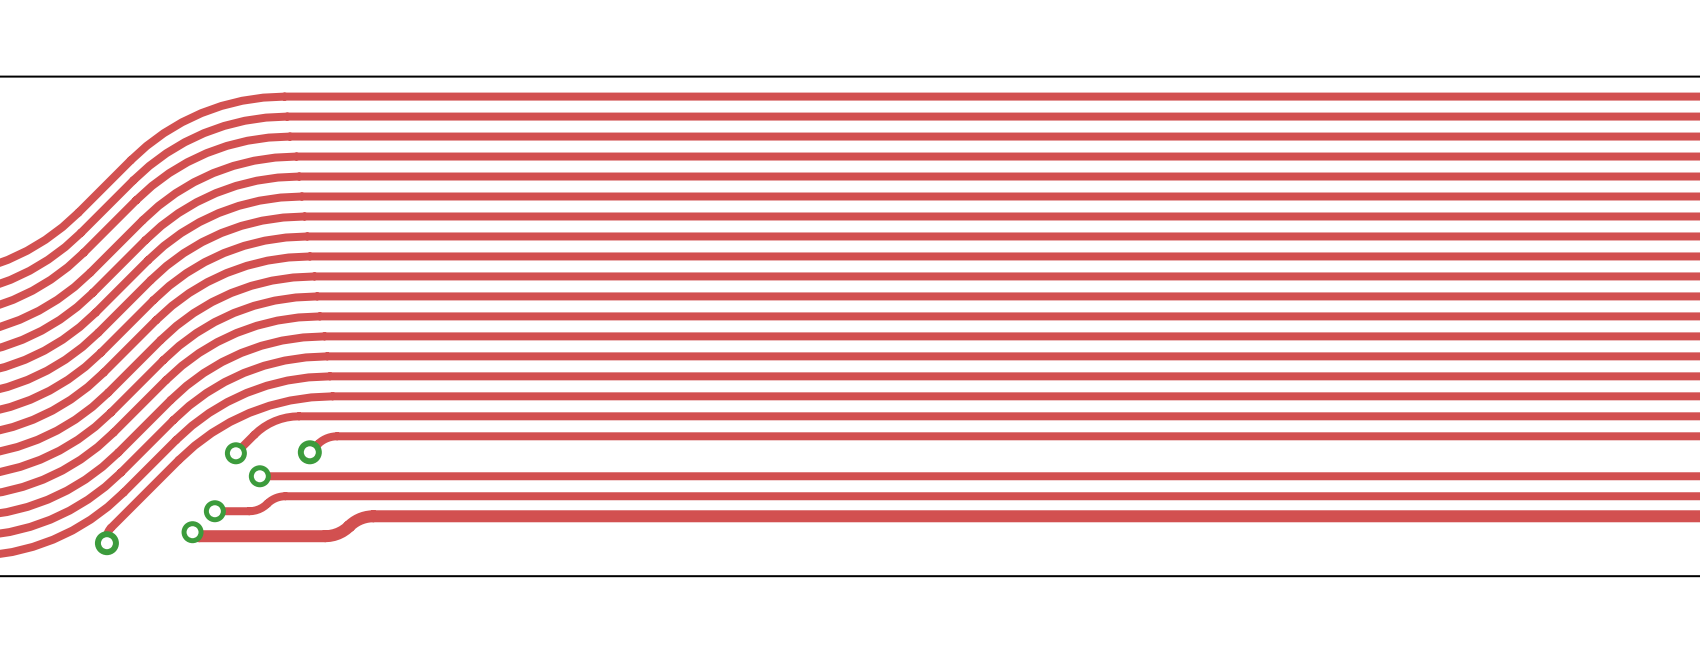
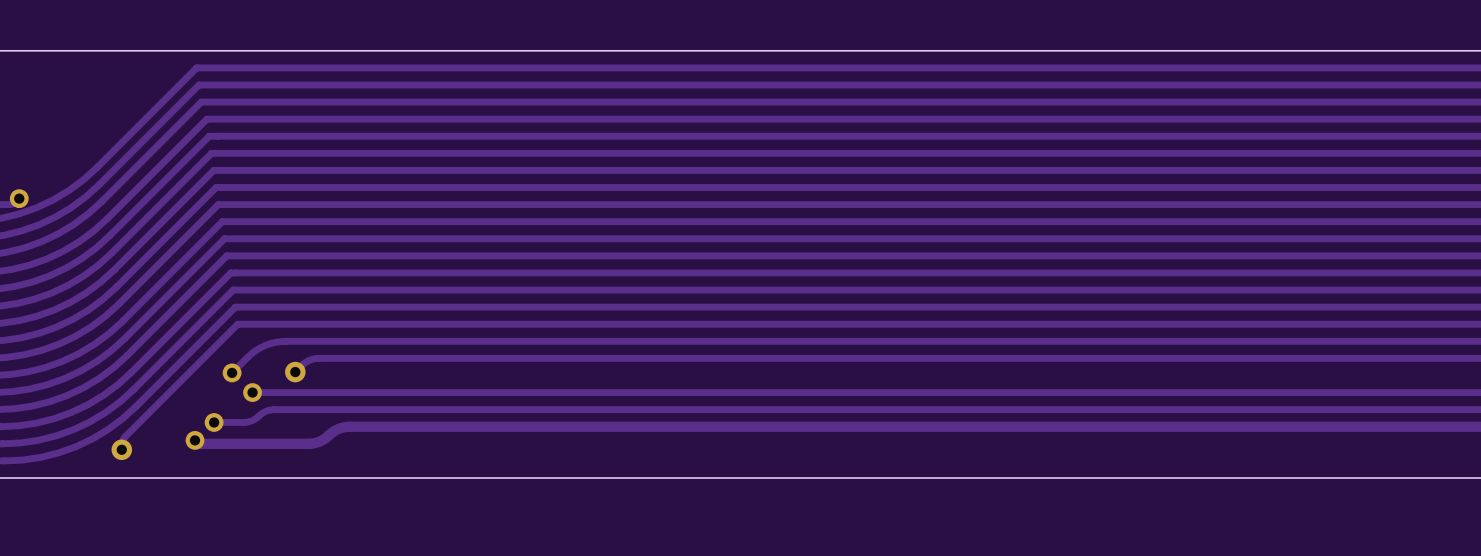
track: (284, 96) (242, 100) (201, 113) (163, 133) (130, 160) -> (273, 67) (196, 67) (142, 122)
track: (287, 116) (244, 120) (204, 133) (166, 153) (133, 180) -> (276, 84) (198, 84) (144, 139)
track: (289, 136) (247, 140) (206, 153) (169, 173) (136, 200) -> (278, 102) (201, 102) (146, 156)
track: (296, 156) (254, 160) (213, 173) (175, 193) (142, 220) -> (283, 119) (206, 119) (152, 173)
track: (299, 176) (256, 180) (215, 193) (178, 213) (145, 240) -> (286, 136) (209, 136) (154, 190)
track: (301, 196) (259, 200) (218, 213) (181, 233) (148, 260) -> (288, 153) (211, 153) (157, 207)
track: (304, 216) (262, 220) (221, 233) (183, 253) (150, 280) -> (290, 170) (213, 170) (159, 224)
track: (307, 236) (264, 240) (224, 253) (186, 273) (153, 300) -> (293, 187) (216, 187) (161, 241)
track: (309, 256) (267, 260) (226, 273) (189, 293) (156, 320) -> (295, 204) (218, 204) (163, 259)
track: (314, 276) (272, 280) (231, 292) (193, 313) (160, 340) -> (299, 221) (222, 221) (167, 276)
track: (317, 296) (274, 300) (233, 312) (196, 333) (163, 360) -> (301, 238) (224, 238) (170, 293)
track: (319, 316) (277, 320) (236, 332) (199, 353) (166, 380) -> (303, 255) (226, 255) (172, 310)
track: (324, 336) (282, 340) (241, 352) (203, 373) (170, 400) -> (307, 272) (230, 272) (176, 327)
track: (327, 356) (284, 360) (244, 372) (206, 393) (173, 420) -> (310, 290) (233, 290) (178, 344)
track: (329, 376) (287, 380) (246, 392) (209, 413) (176, 440) -> (312, 307) (235, 307) (180, 361)
track: (332, 396) (290, 400) (249, 412) (211, 432) (178, 460) -> (314, 324) (237, 324) (183, 378)

